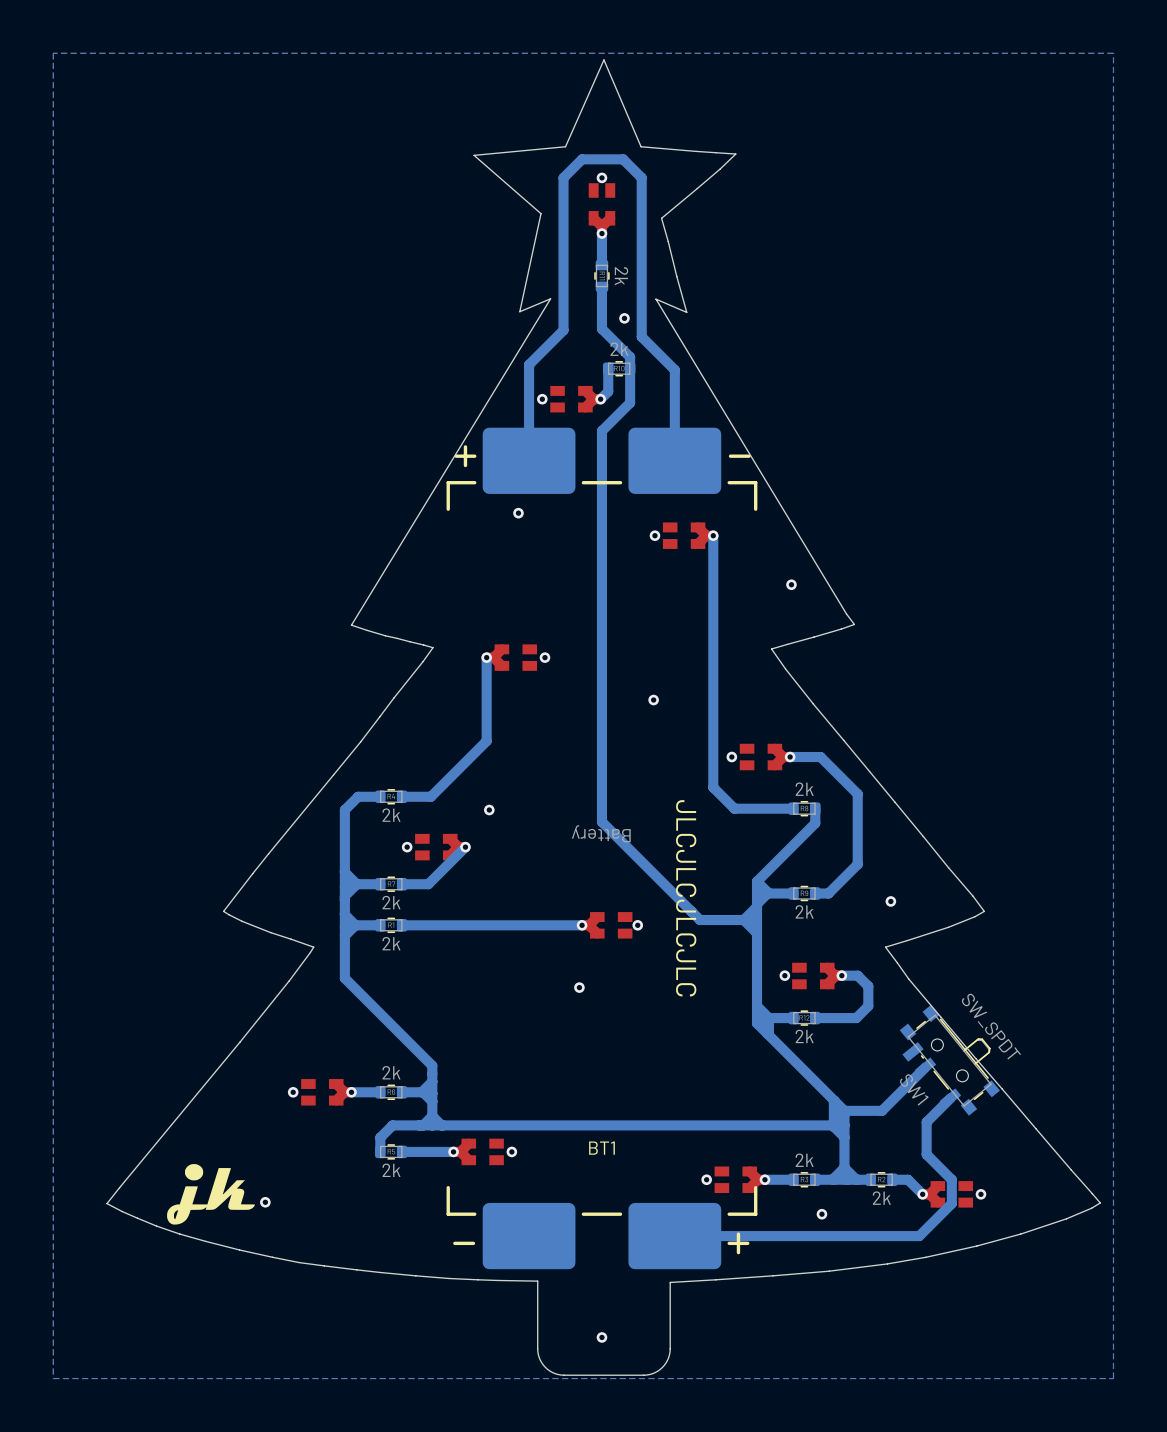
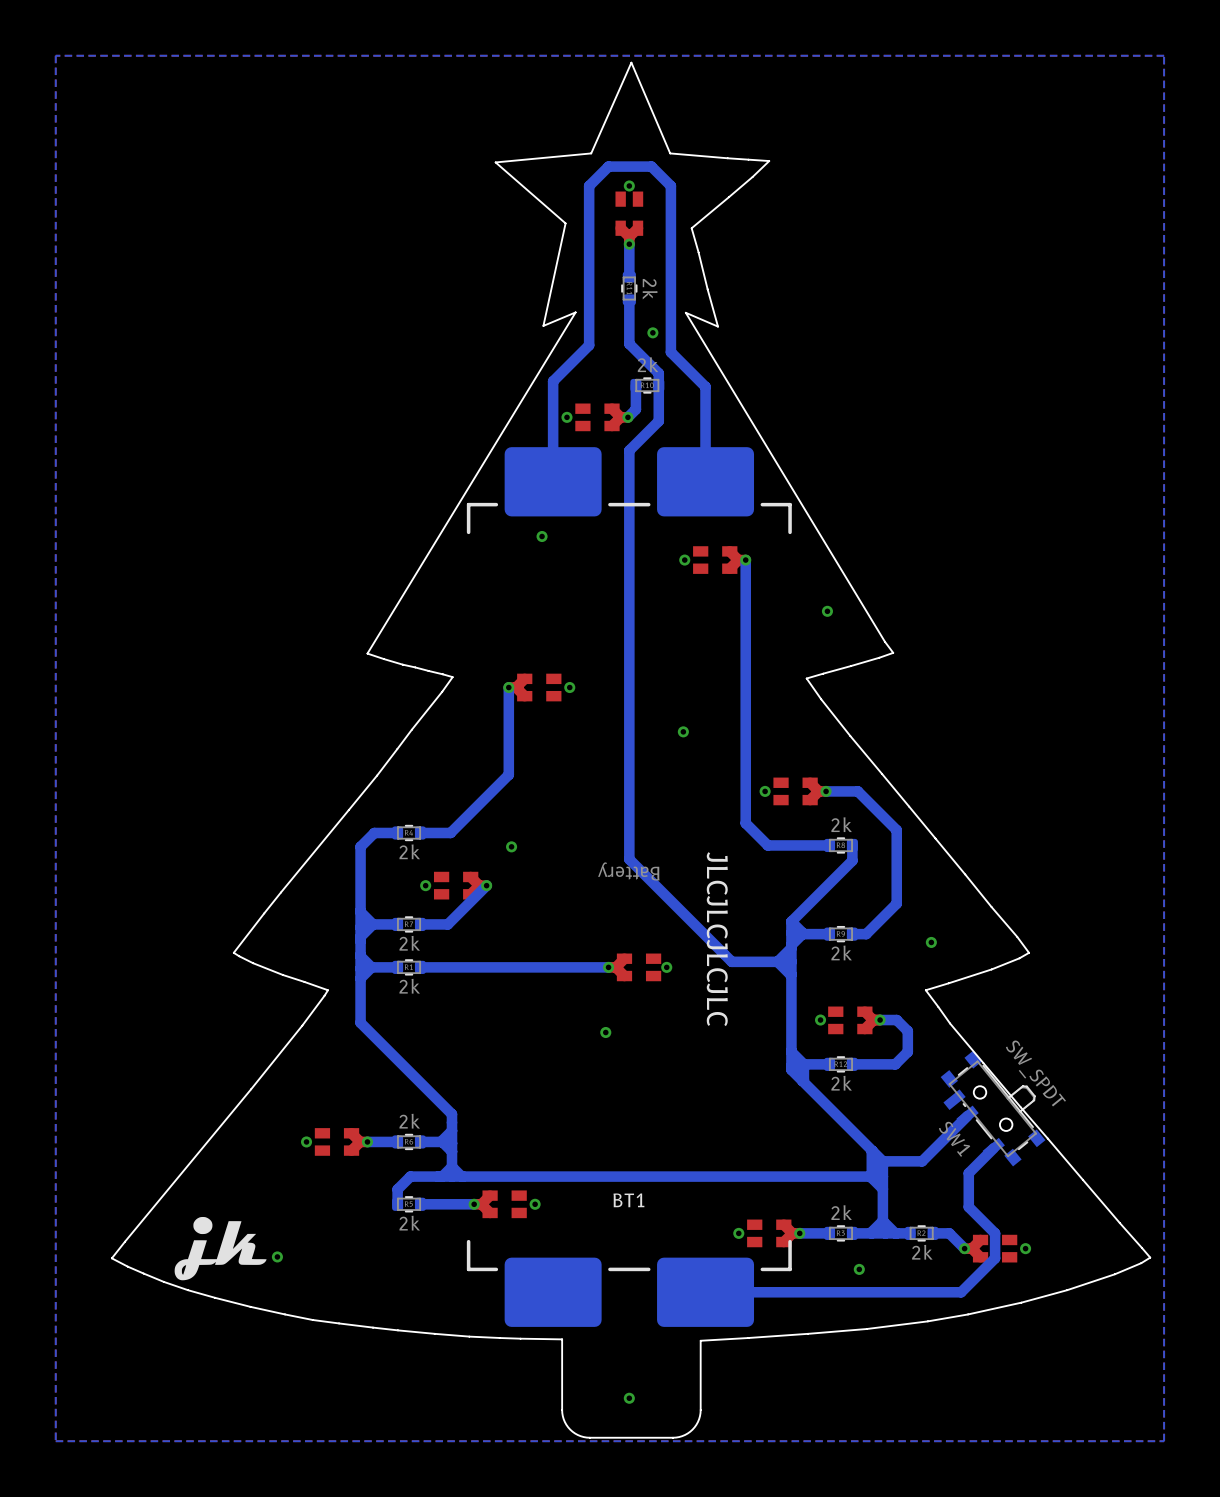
BT1 footprint: [446, 427, 758, 1270] -> [466, 447, 792, 1327]

